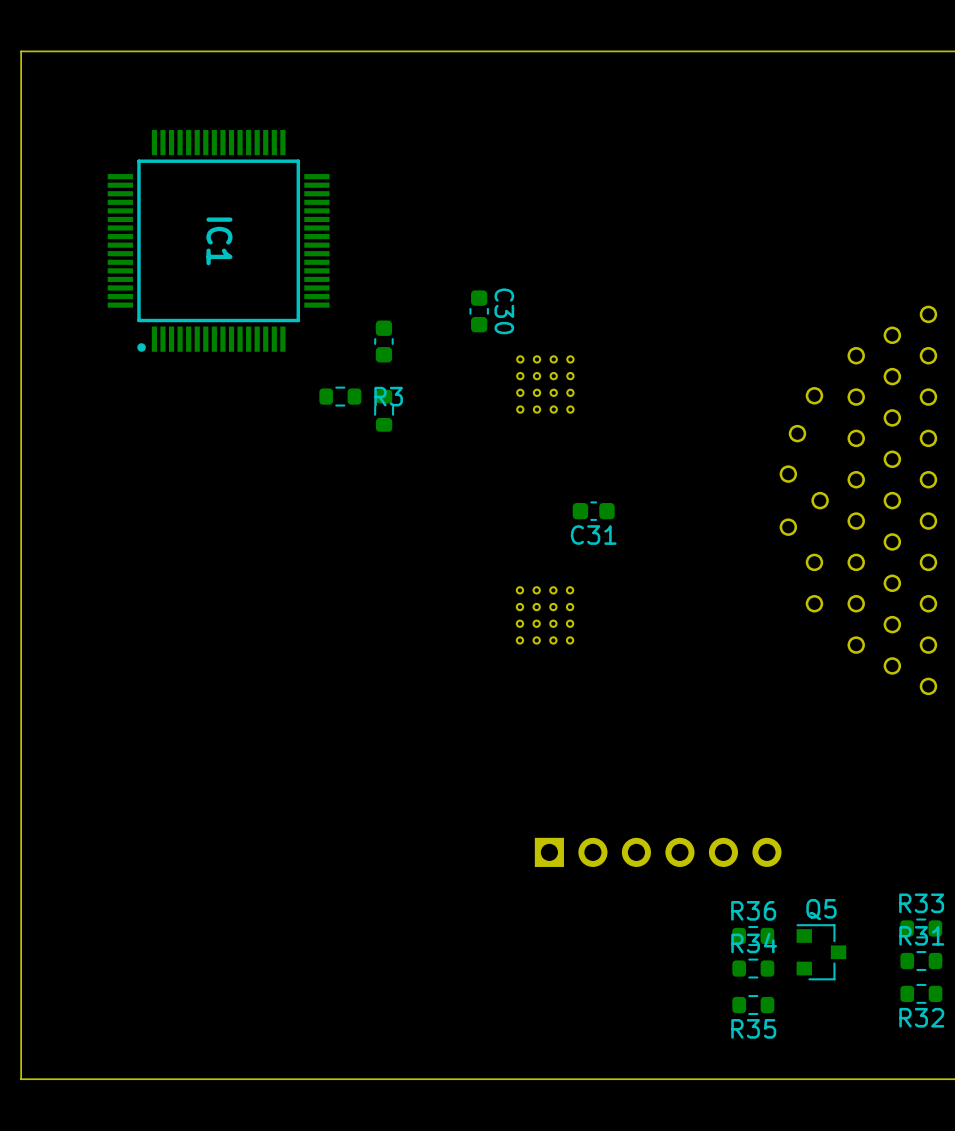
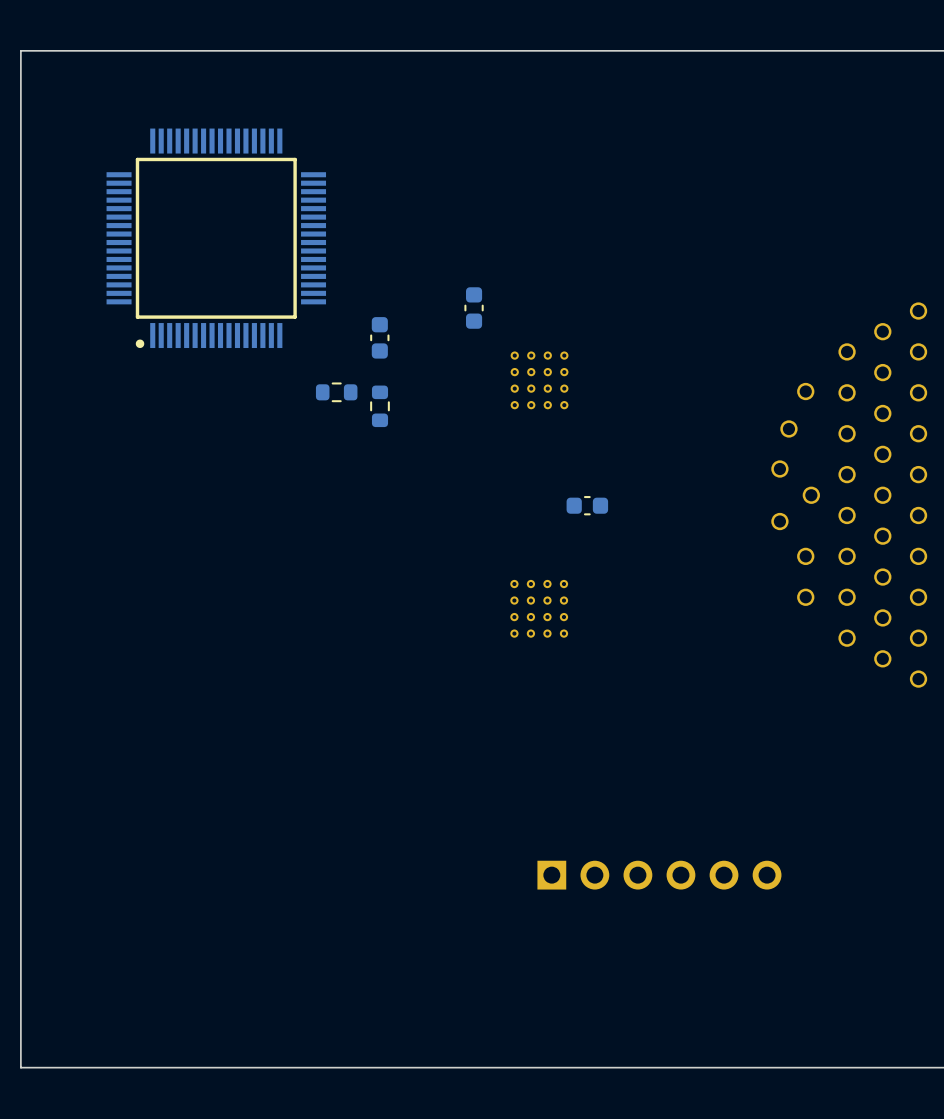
IC1 name: IC1 (219, 241) -> none
C30 name: C30 (504, 311) -> none
R3 name: R3 (388, 396) -> none
C31 name: C31 (593, 535) -> none
part position: (658, 852) -> (659, 875)
R33: (921, 928) -> none
R36: (753, 935) -> none
Q5: (821, 952) -> none
R31: (921, 961) -> none
R34: (753, 968) -> none
R32: (921, 993) -> none
R35: (753, 1005) -> none

